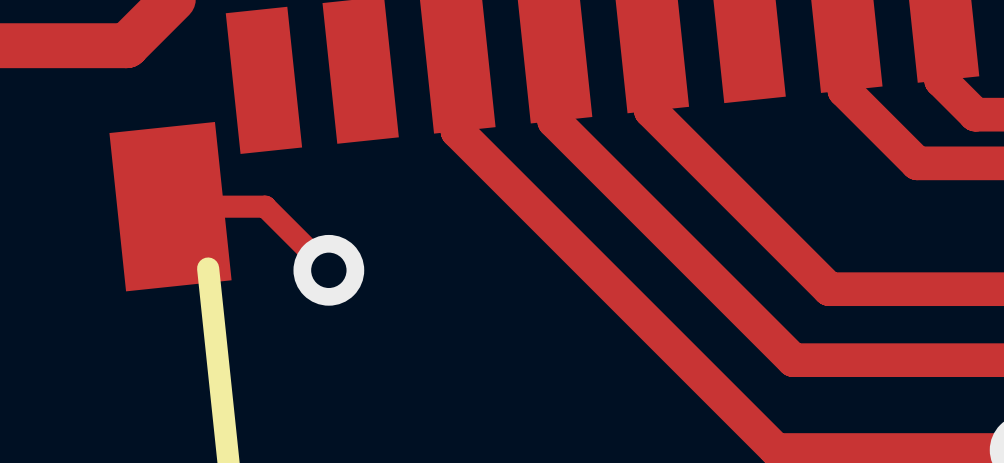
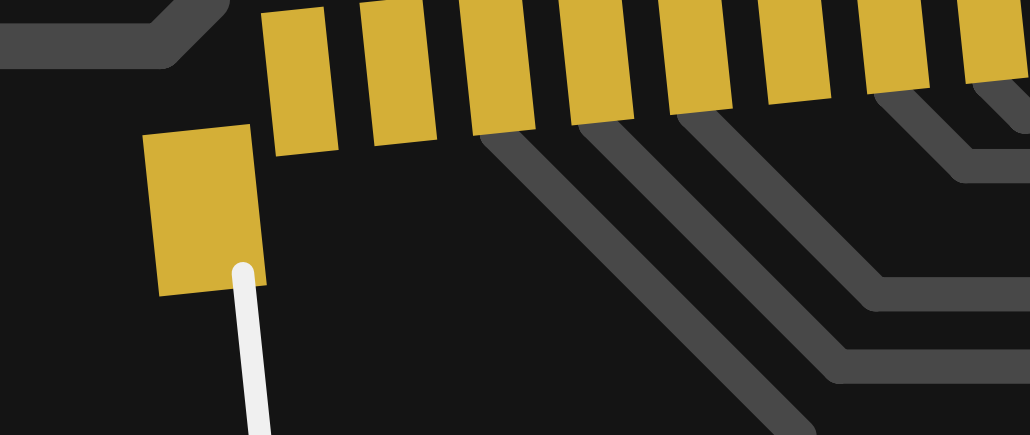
track: (170, 206) (265, 206) (328, 270) -> none
via: (328, 270) -> none

